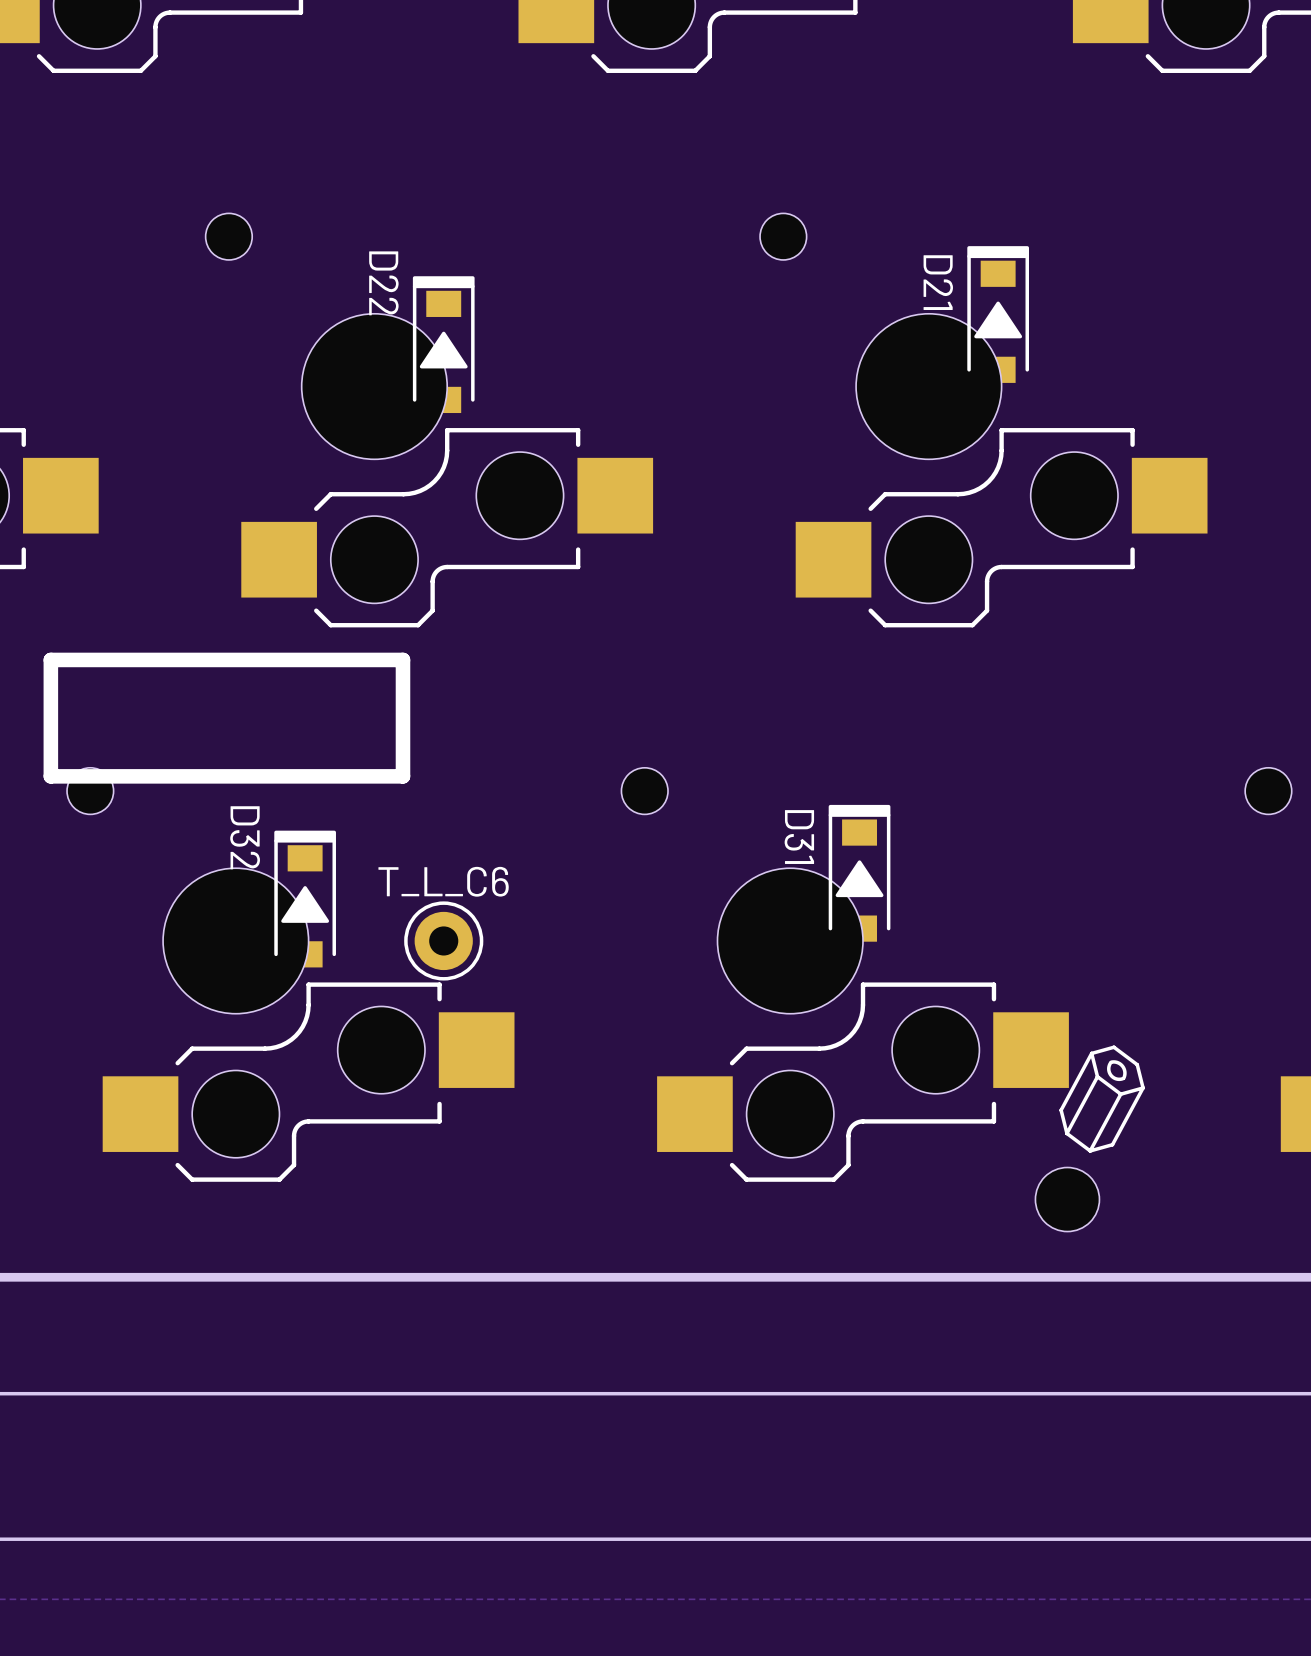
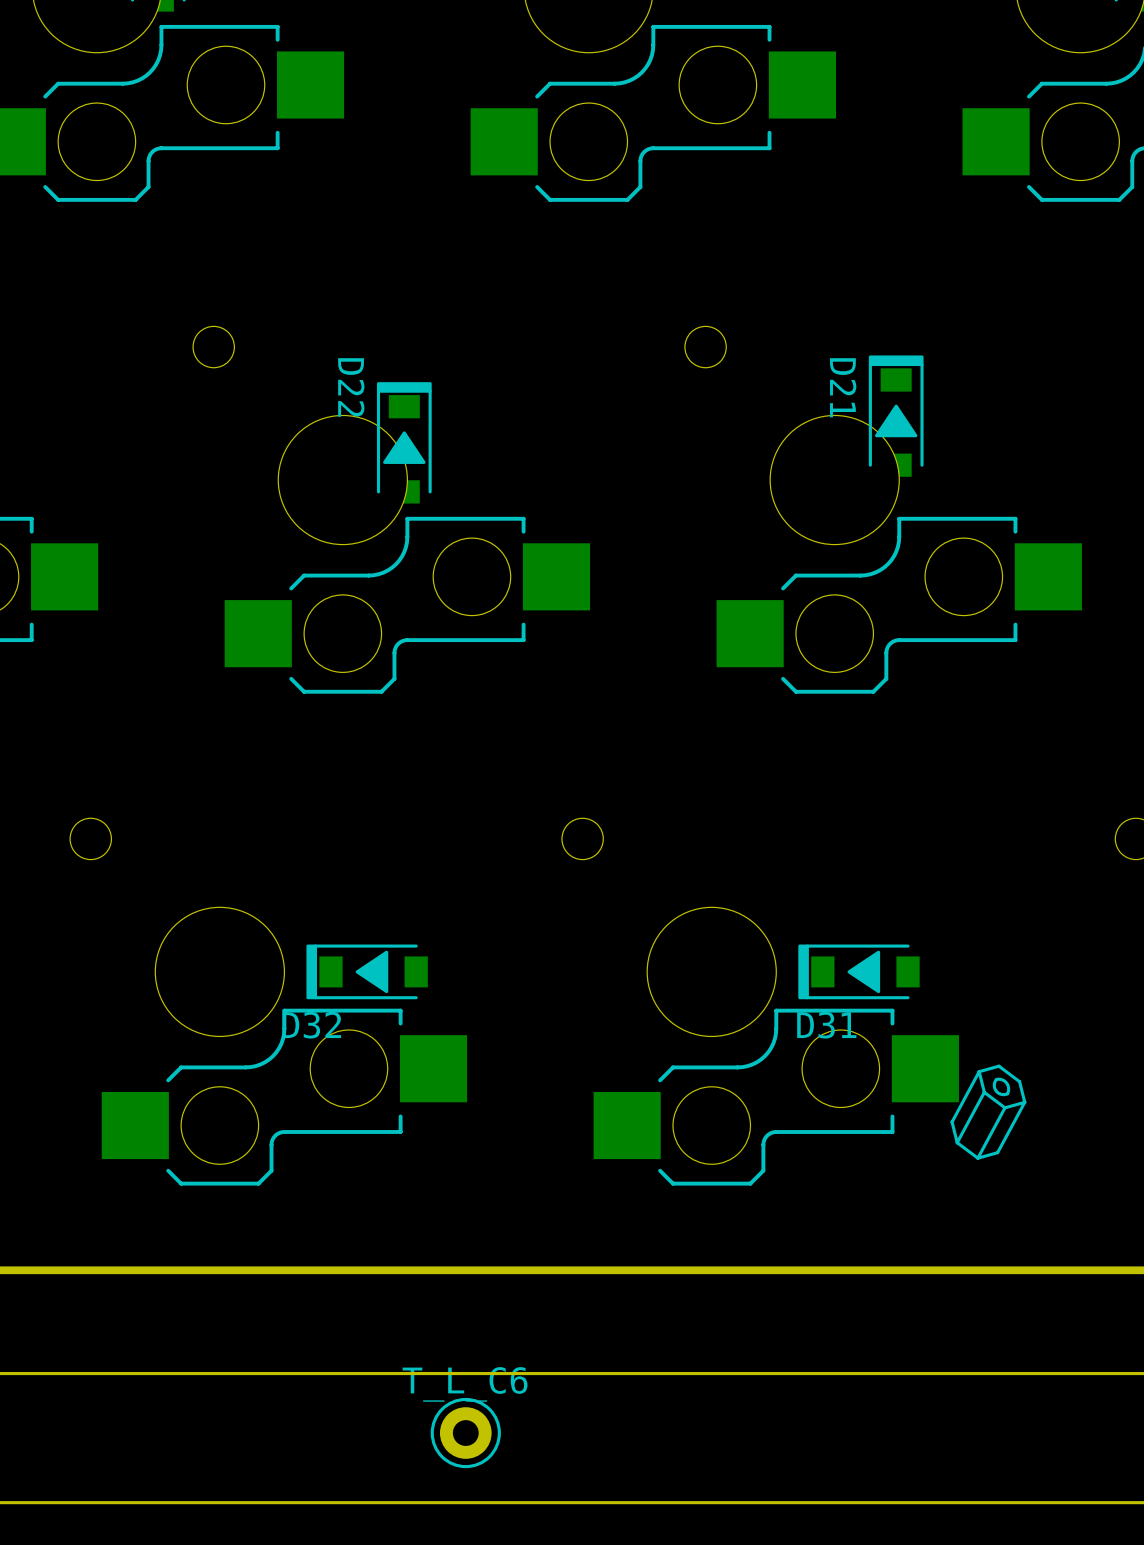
line: (402, 659) (50, 659) (50, 776) (402, 776) (402, 659) -> none
D31 rotation: 0° (859, 873) -> 90° counterclockwise (858, 971)
D31 position: (859, 873) -> (858, 971)
D32 rotation: 0° (305, 899) -> 90° counterclockwise (367, 971)
D32 position: (305, 899) -> (367, 971)
T_L_C6 position: (443, 940) -> (465, 1433)
part: (1067, 1199) -> none

